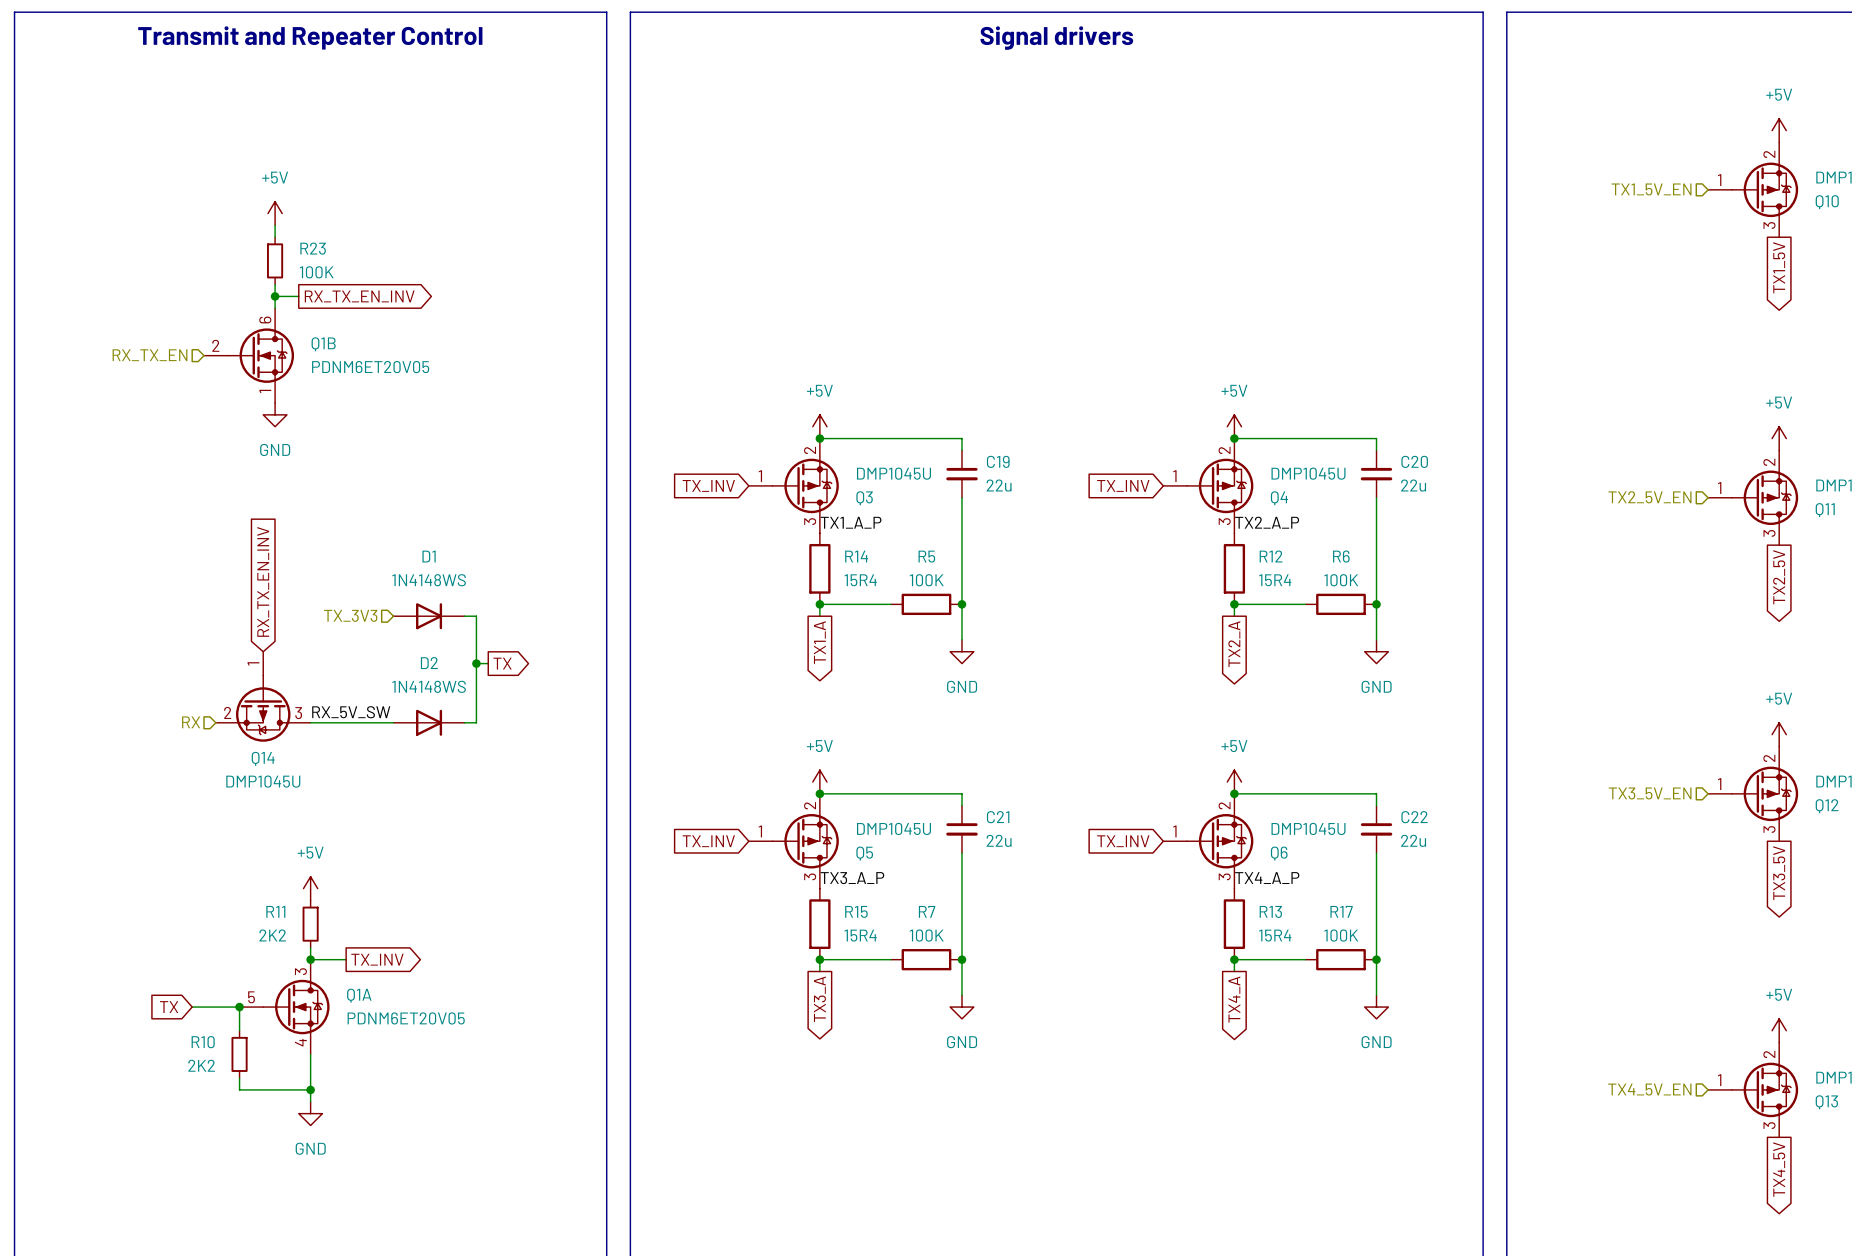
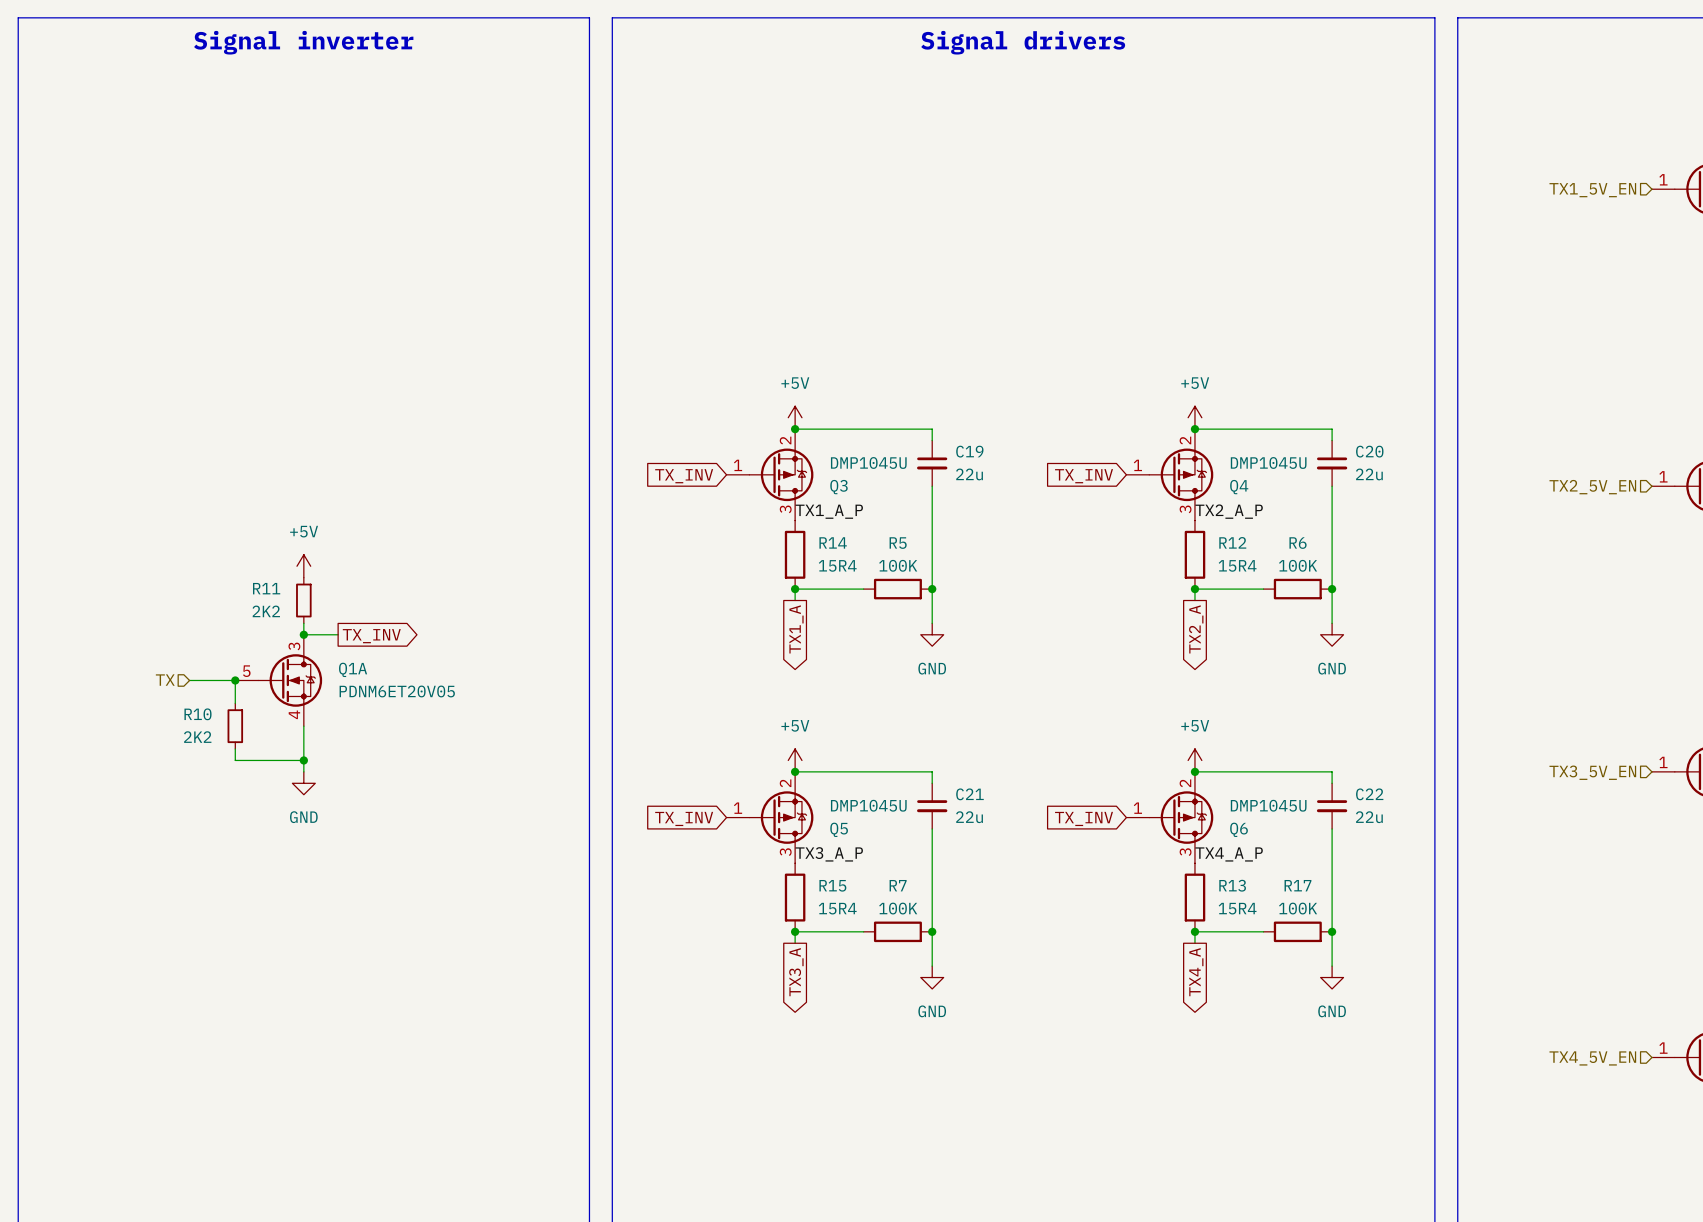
text: Transmit and Repeater Control (310, 37) -> Signal inverter (303, 42)
power symbol: +5V (275, 213) -> none
wire: (275, 225) (275, 237) -> none
R23: 100K (275, 260) -> none
wire: (275, 284) (275, 308) -> none
wire: (275, 296) (298, 296) -> none
junction: (275, 296) -> none
global label: RX_TX_EN_INV (359, 296) -> none
hierarchical label: RX_TX_EN (150, 355) -> none
Q1B: PDNM6ET20V05 (249, 355) -> none
power symbol: GND (275, 414) -> none
power symbol: none -> +5V (303, 566)
global label: RX_TX_EN_INV (263, 581) -> none
hierarchical label: TX_3V3 (350, 615) -> none
D1: 1N4148WS (429, 616) -> none
wire: (464, 616) (476, 616) (476, 722) (464, 722) -> none
wire: none -> (303, 623) (303, 634) (338, 634)
junction: none -> (303, 634)
global label: none -> TX_INV (371, 636)
wire: (476, 663) (488, 663) -> none
junction: (476, 663) -> none
global label: TX (502, 663) -> none
Q14: DMP1045U (263, 696) -> none
hierarchical label: none -> TX (165, 680)
wire: none -> (189, 680) (235, 680) (235, 703)
junction: none -> (235, 680)
label: RX_5V_SW (351, 712) -> none
hierarchical label: RX (191, 722) -> none
wire: (310, 722) (393, 722) -> none
D2: 1N4148WS (429, 722) -> none
wire: none -> (303, 726) (303, 771)
wire: none -> (235, 749) (235, 760) (303, 760)
junction: none -> (303, 760)
power symbol: none -> GND (303, 783)
power symbol: +5V (310, 888) -> none
R11 position: (310, 924) -> (303, 600)
wire: (310, 947) (310, 959) (346, 959) -> none
junction: (310, 959) -> none
global label: TX_INV (377, 959) -> none
global label: TX (169, 1007) -> none
wire: (192, 1007) (239, 1007) (239, 1030) -> none
junction: (239, 1007) -> none
Q1A position: (284, 1007) -> (278, 680)
R10 position: (239, 1054) -> (235, 726)
wire: (310, 1054) (310, 1101) -> none
wire: (239, 1078) (239, 1089) (310, 1089) -> none
junction: (310, 1089) -> none
power symbol: GND (310, 1113) -> none

